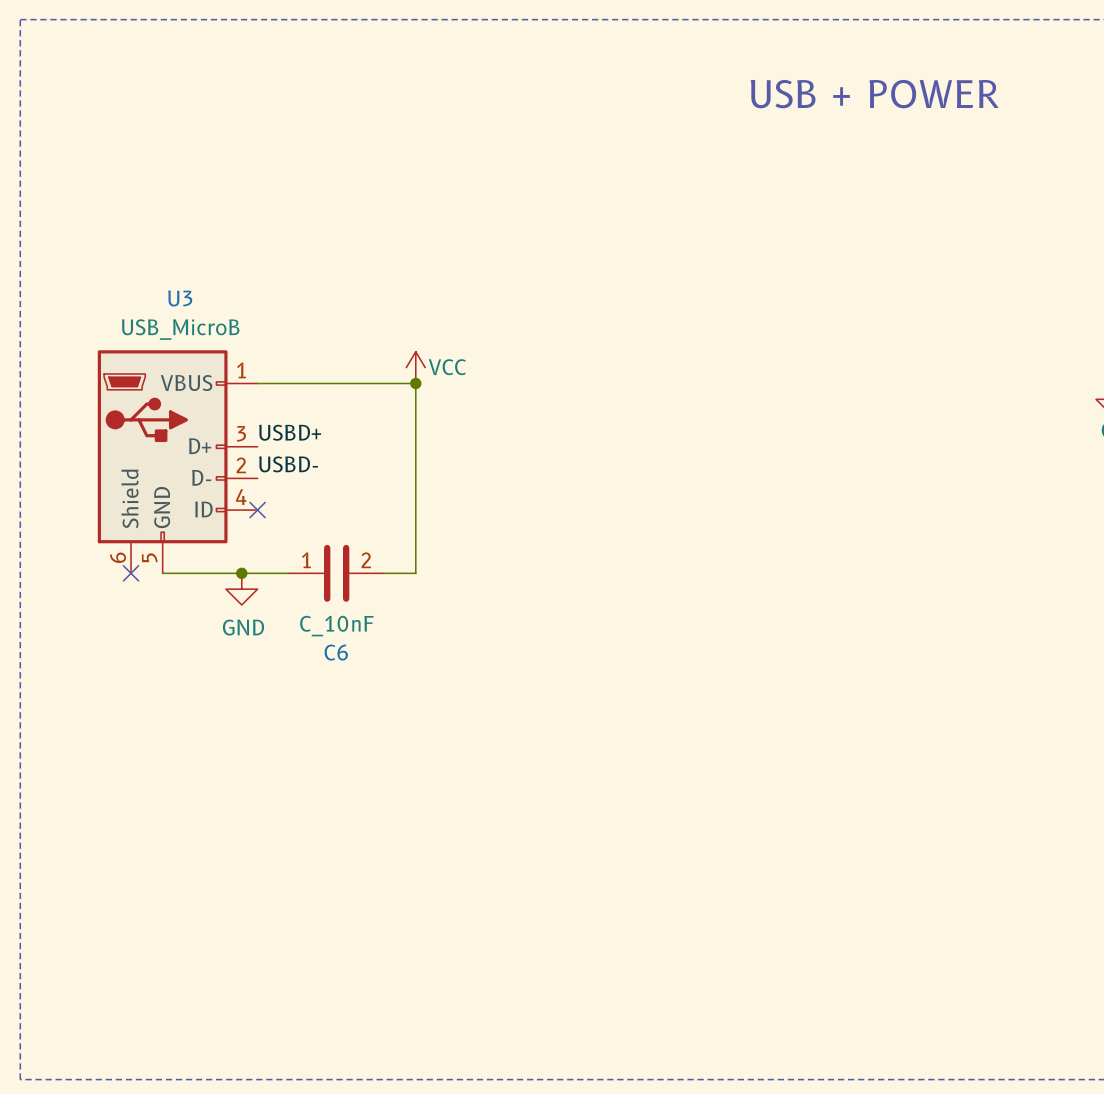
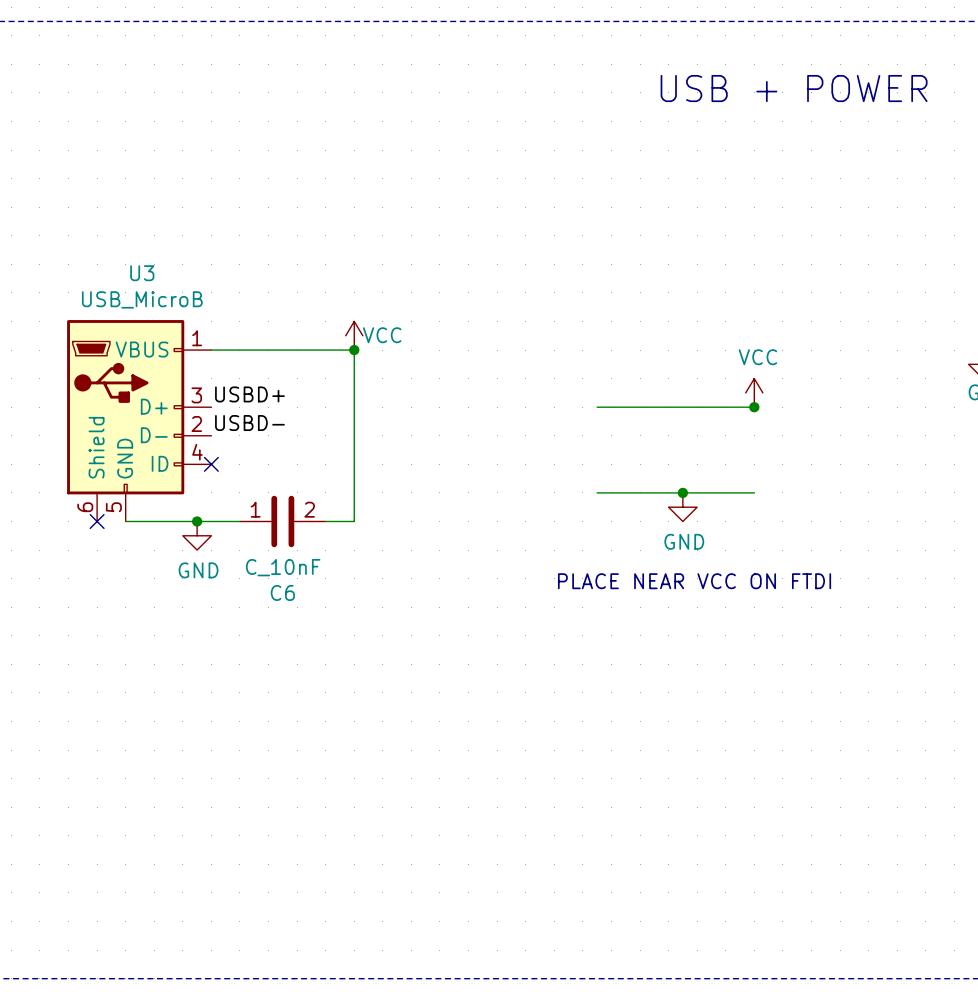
power symbol: none -> VCC (754, 392)
wire: none -> (597, 407) (754, 407)
junction: none -> (754, 407)
wire: none -> (597, 492) (754, 492)
junction: none -> (682, 492)
power symbol: none -> GND (682, 507)
text: none -> PLACE NEAR VCC ON FTDI (694, 581)

